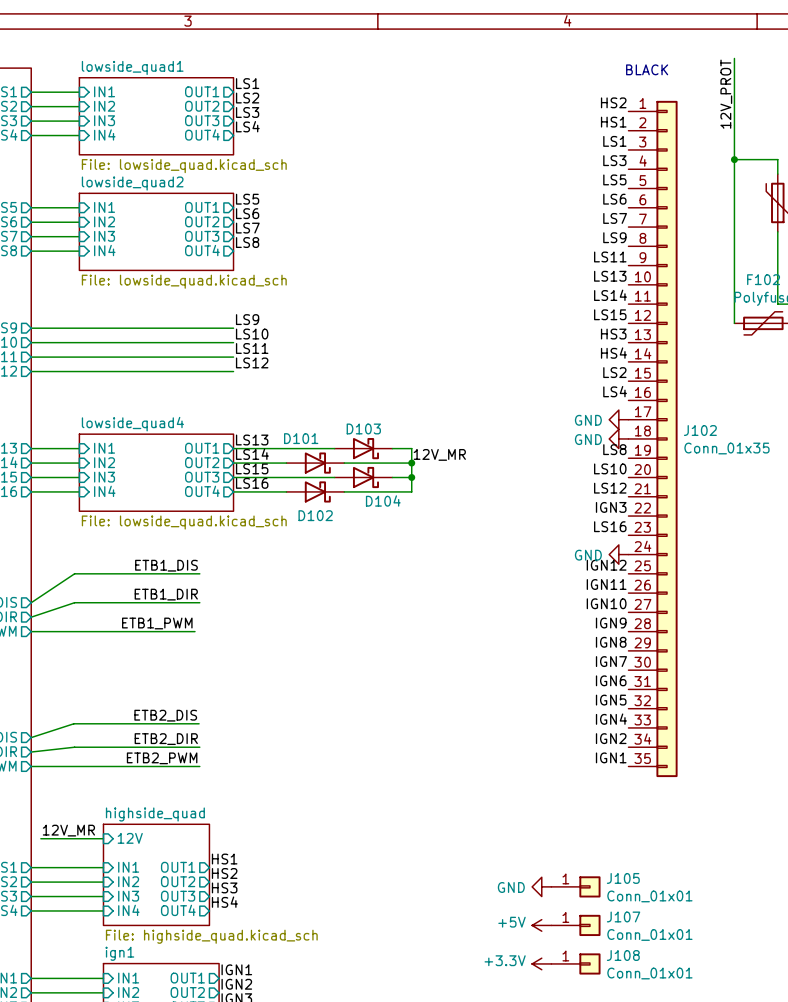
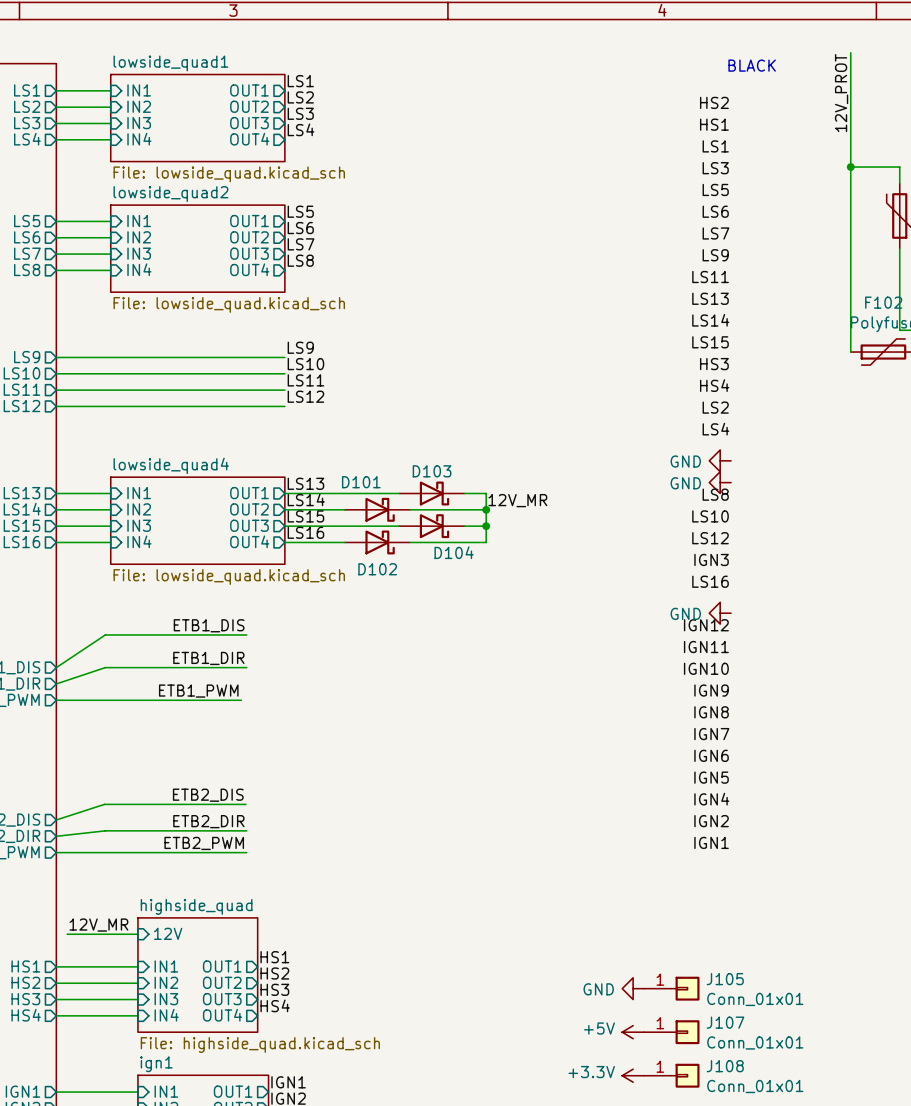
J102: Conn_01x35 (653, 438) -> none

